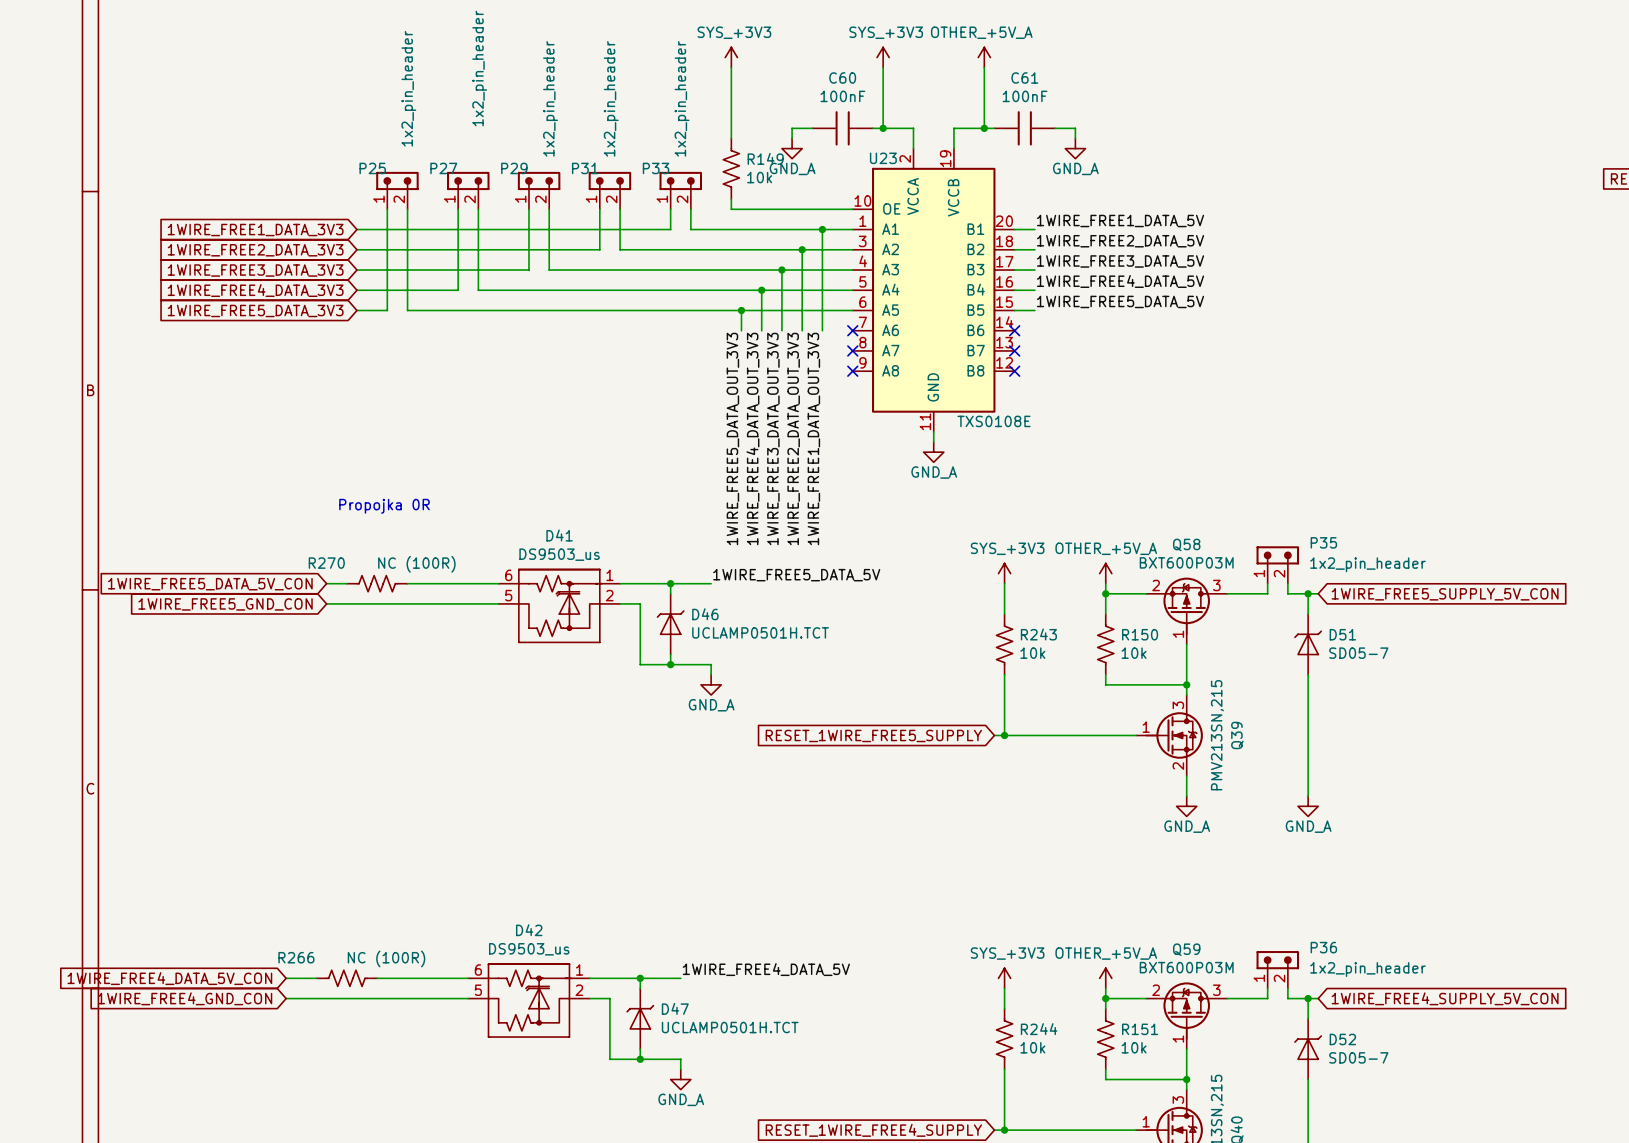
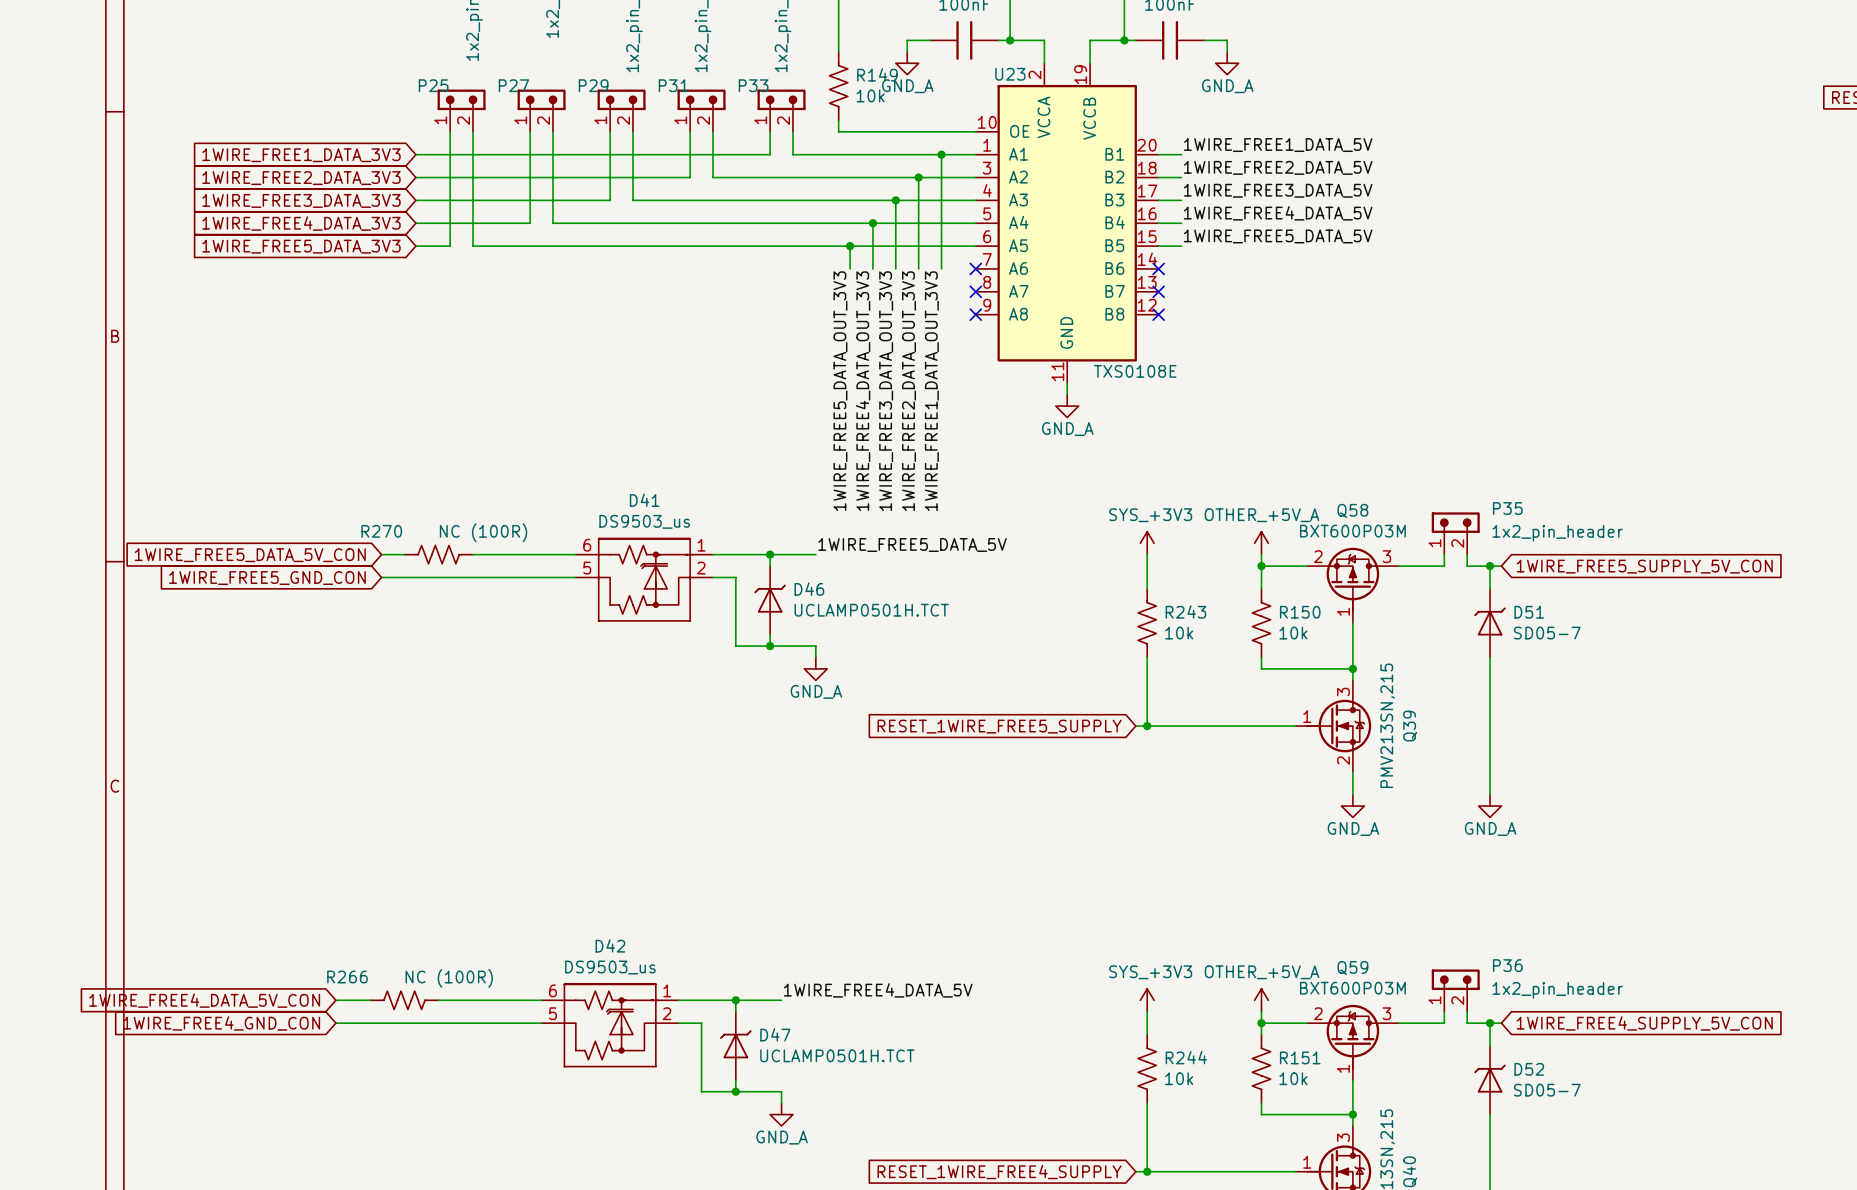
text: Propojka 0R (384, 506) -> none

